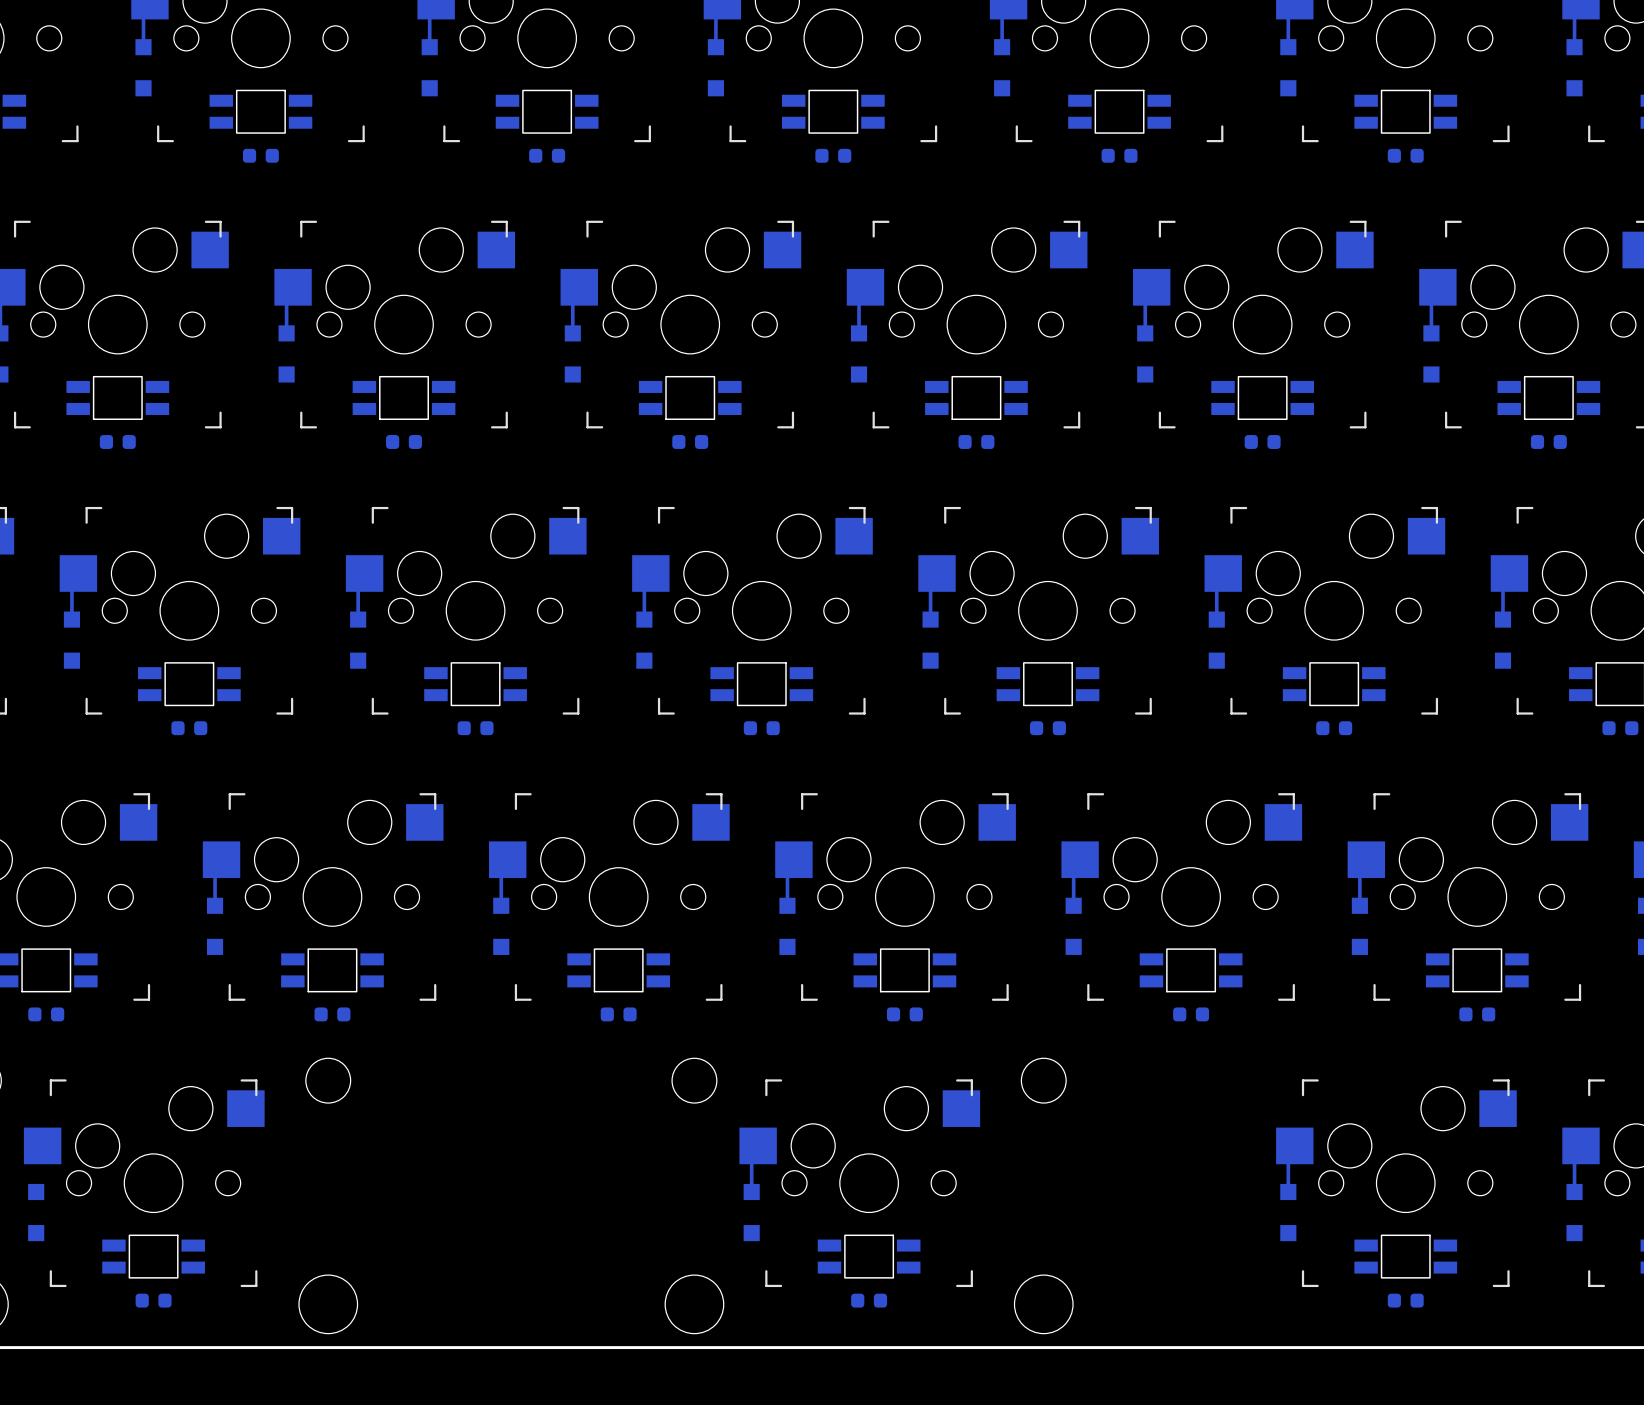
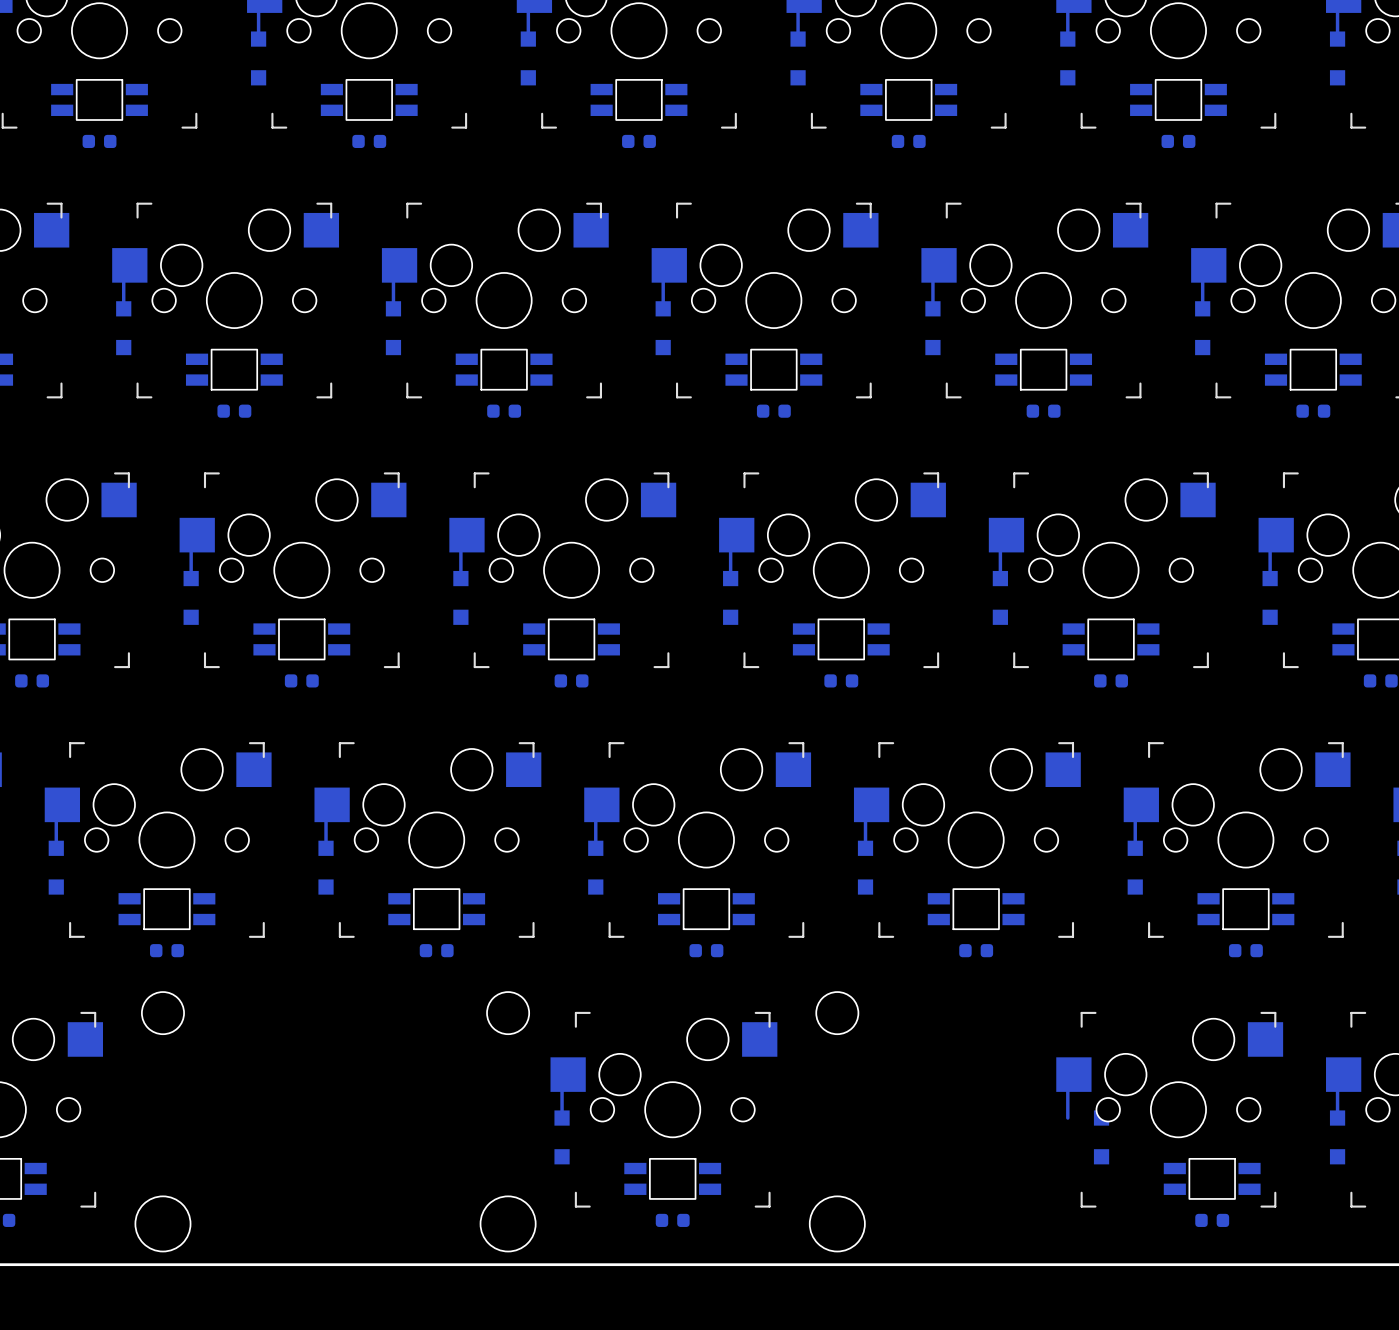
part position: (1288, 1212) -> (1101, 1137)
part position: (1405, 1256) -> (1212, 1178)
part position: (1405, 1300) -> (1212, 1220)

